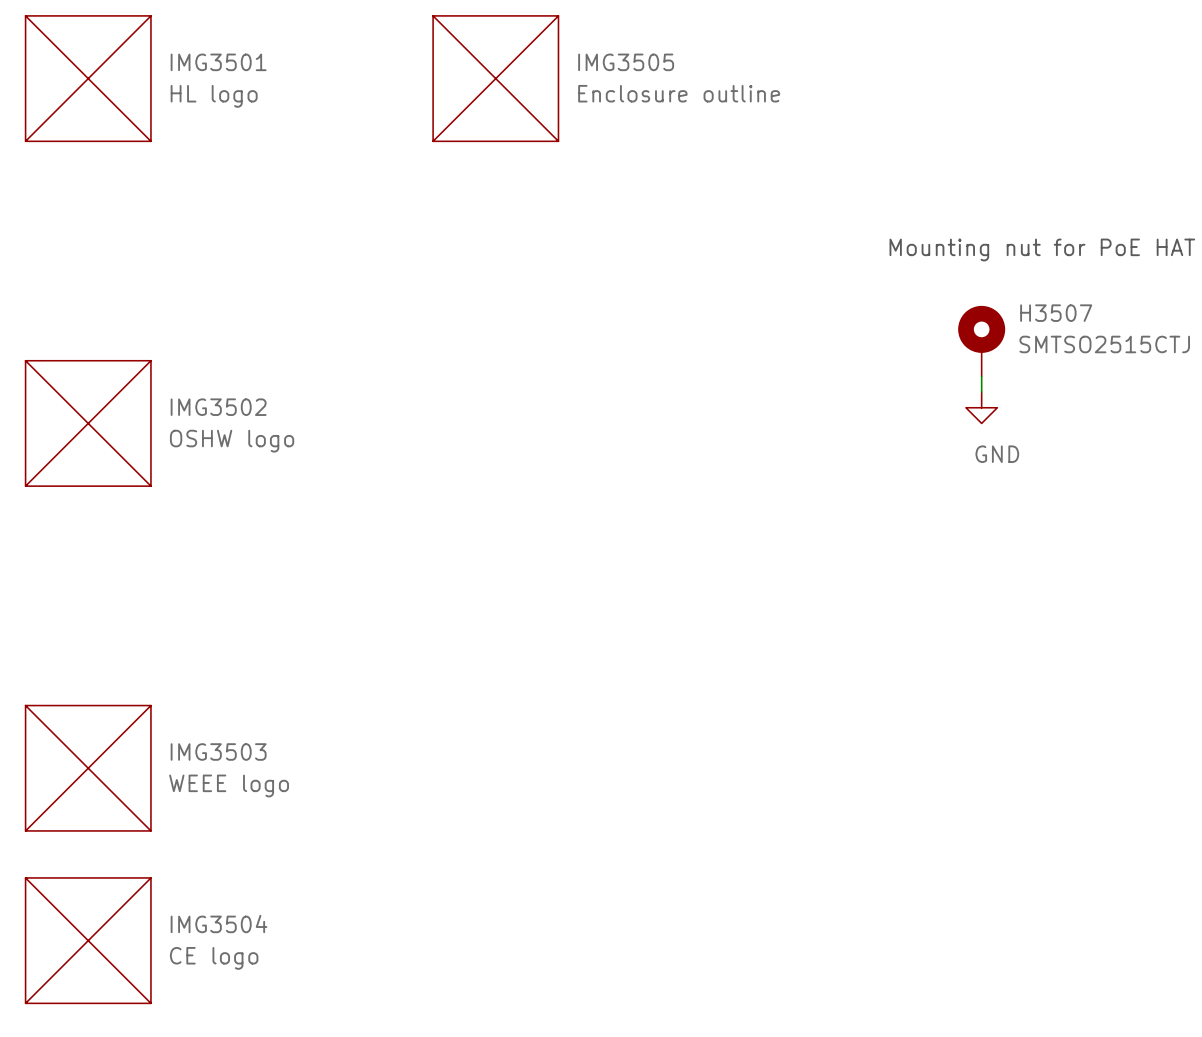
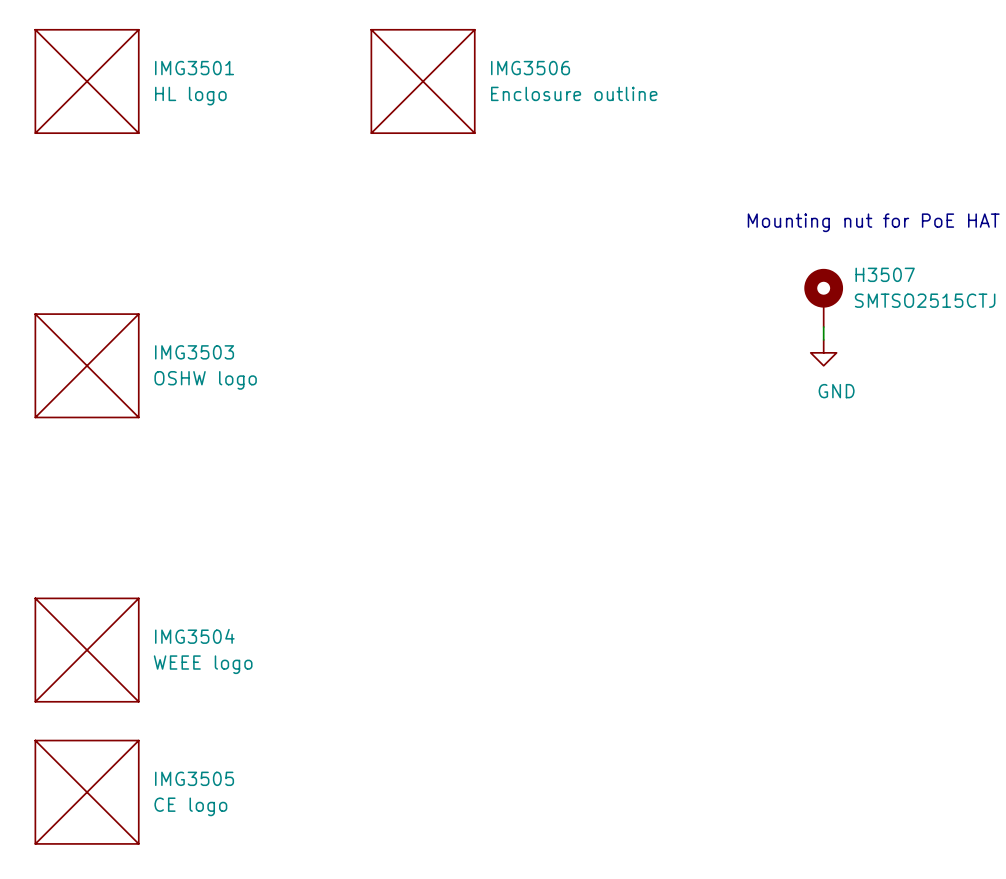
IMG3505 name: IMG3505 (626, 62) -> IMG3506 (530, 68)
IMG3502 name: IMG3502 (218, 407) -> IMG3503 (194, 352)
IMG3503 name: IMG3503 (218, 752) -> IMG3504 (194, 636)
IMG3504 name: IMG3504 (219, 924) -> IMG3505 (194, 778)

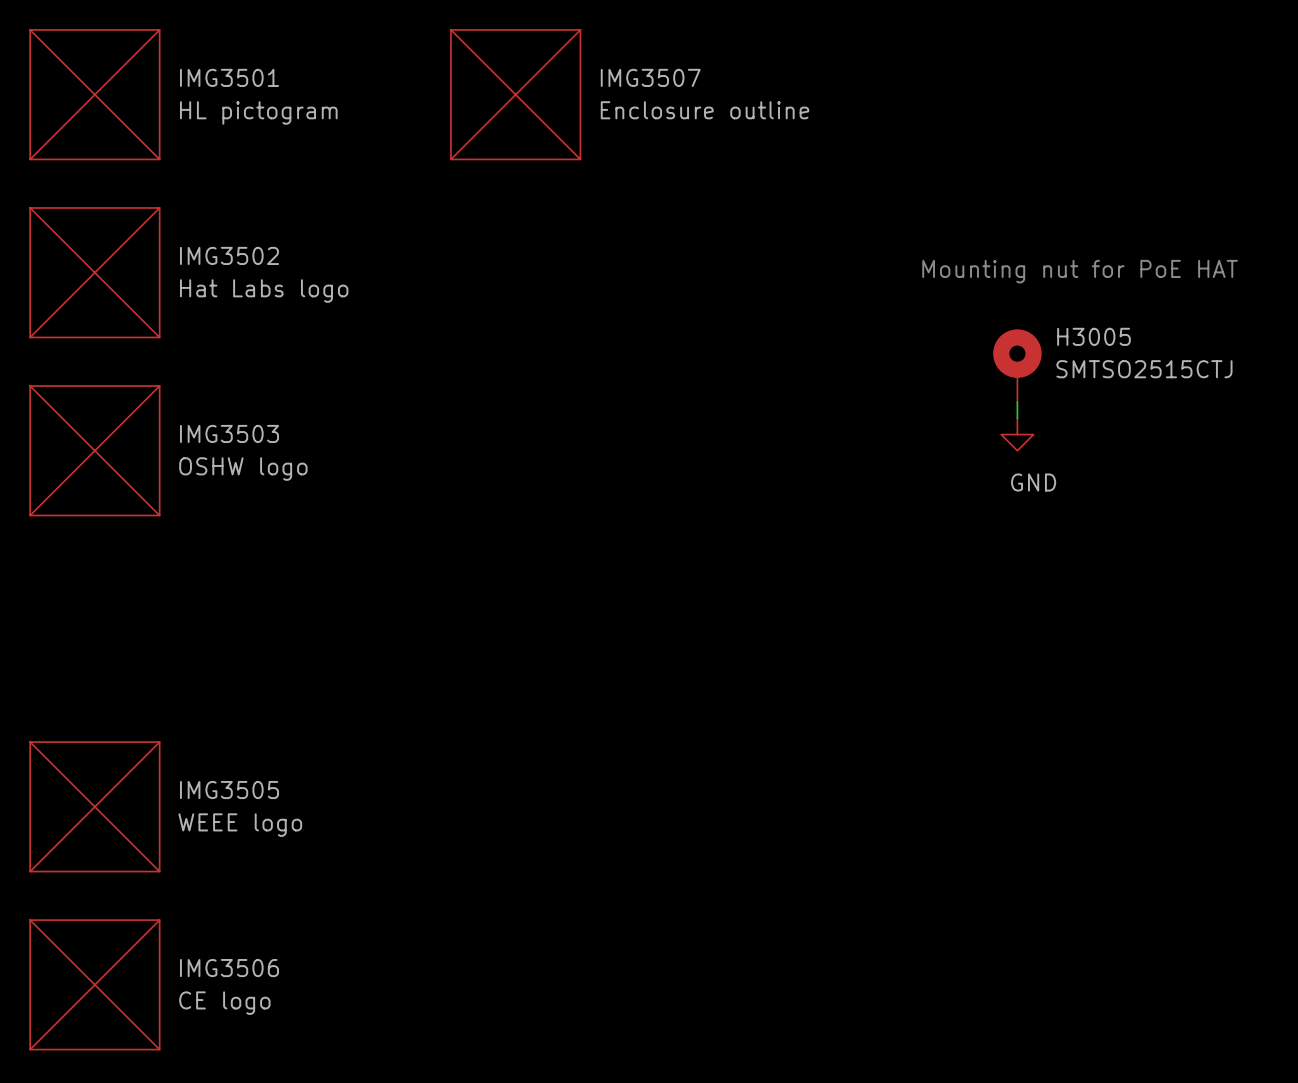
IMG3506 name: IMG3506 (530, 68) -> IMG3507 (650, 77)
IMG3501 value: HL logo (190, 96) -> HL pictogram (258, 112)
IMG3502: none -> Hat Labs logo (94, 272)
H3507 name: H3507 (885, 274) -> H3005 (1093, 336)
IMG3504 name: IMG3504 (194, 636) -> IMG3505 (229, 790)
IMG3505 name: IMG3505 (194, 778) -> IMG3506 (229, 968)

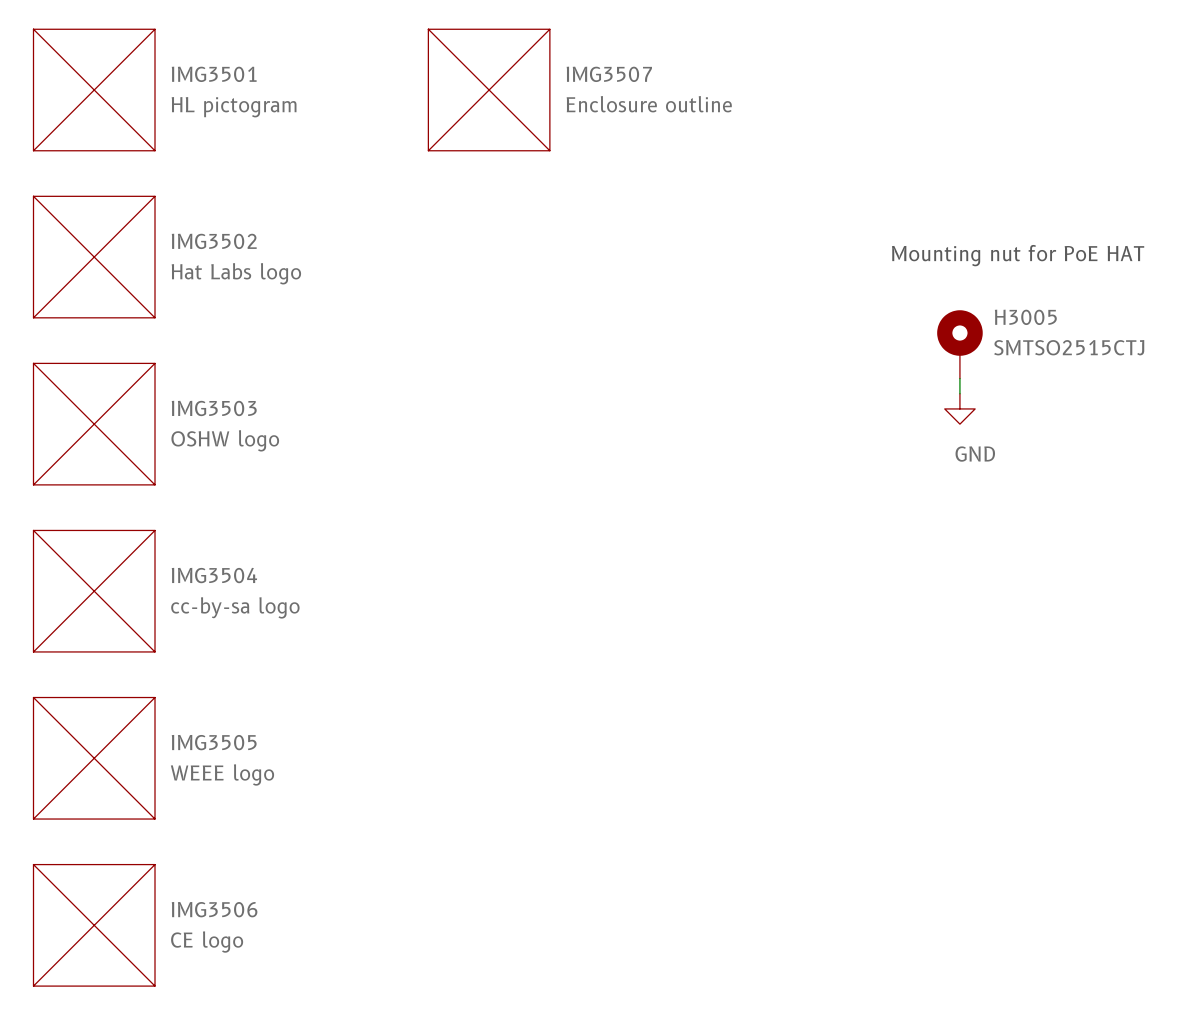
IMG3504: none -> cc-by-sa logo (94, 591)

